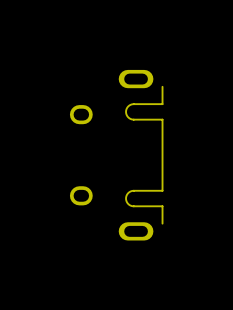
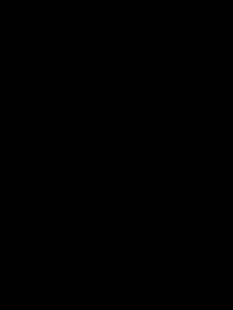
part: (116, 155) -> none

